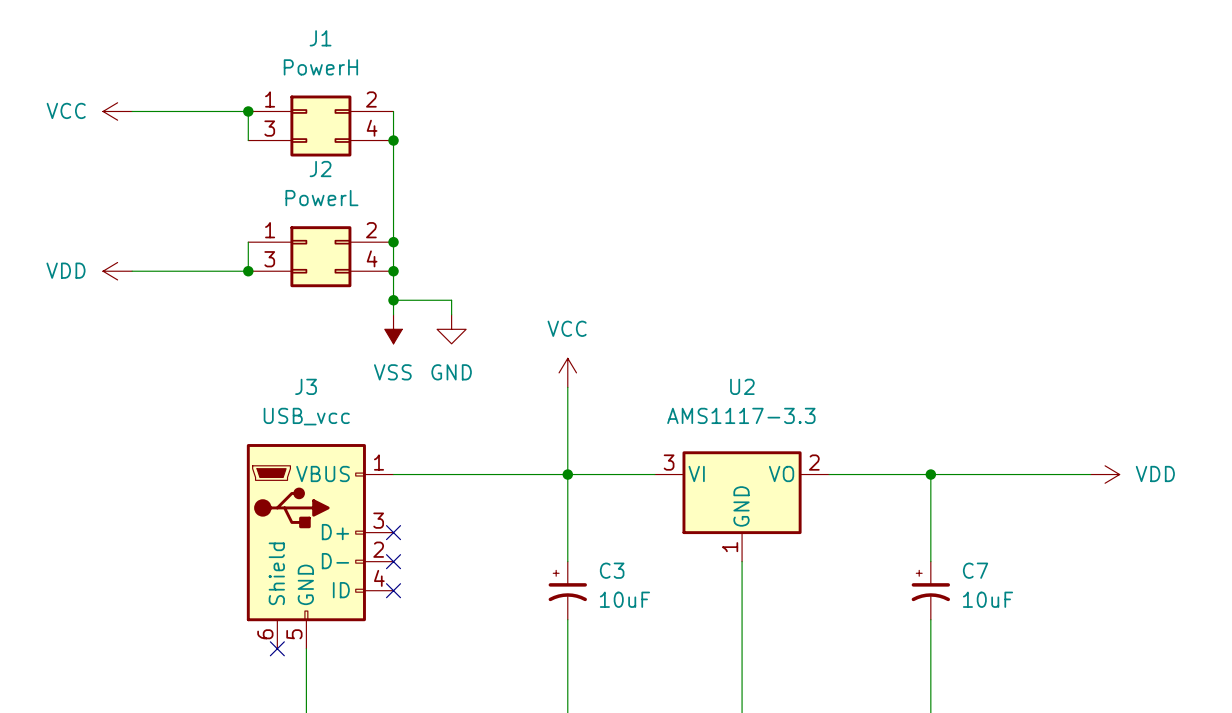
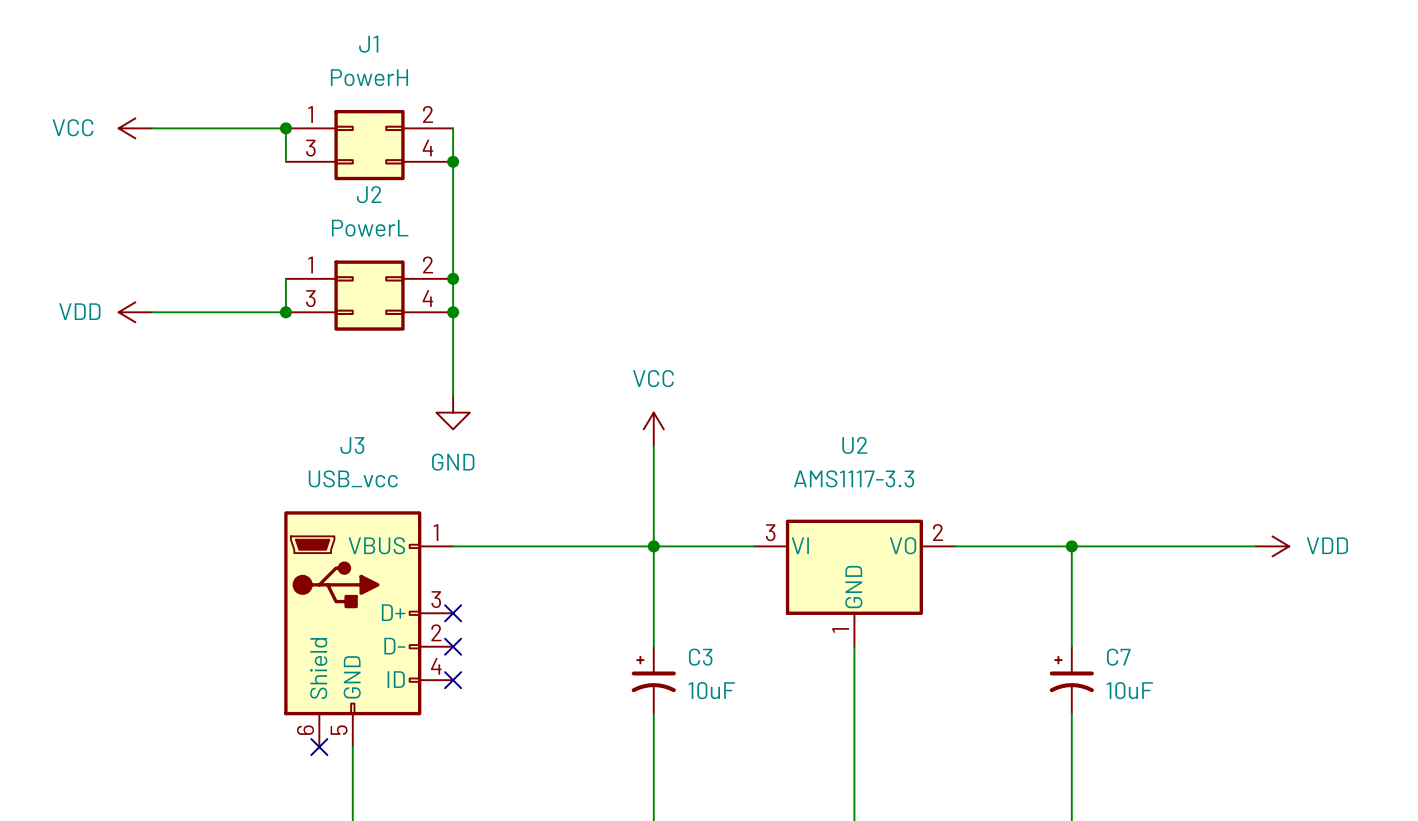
wire: (393, 300) (451, 300) (451, 314) -> none
junction: (393, 300) -> none
power symbol: VSS (393, 329) -> none
power symbol position: GND (451, 329) -> GND (453, 412)

